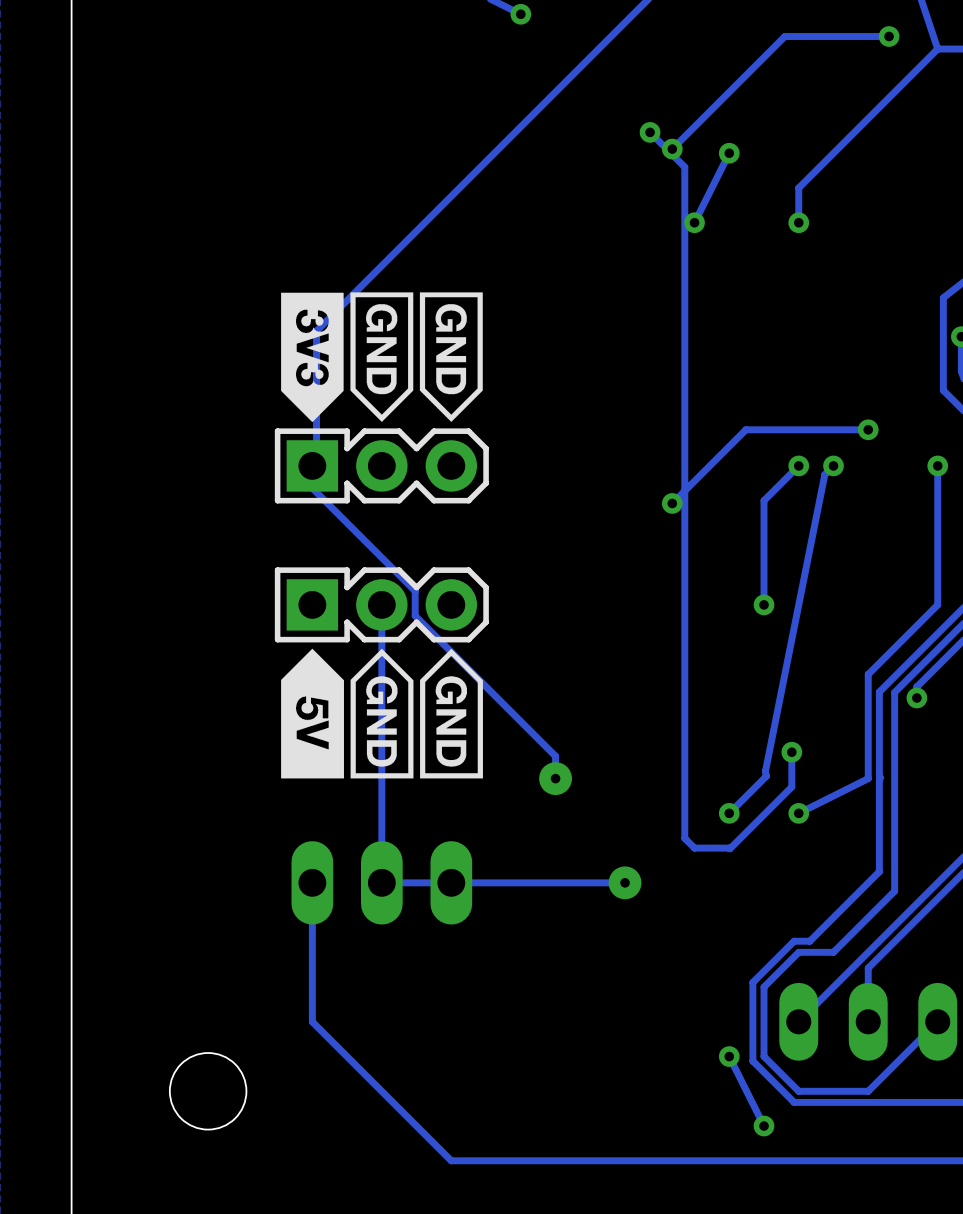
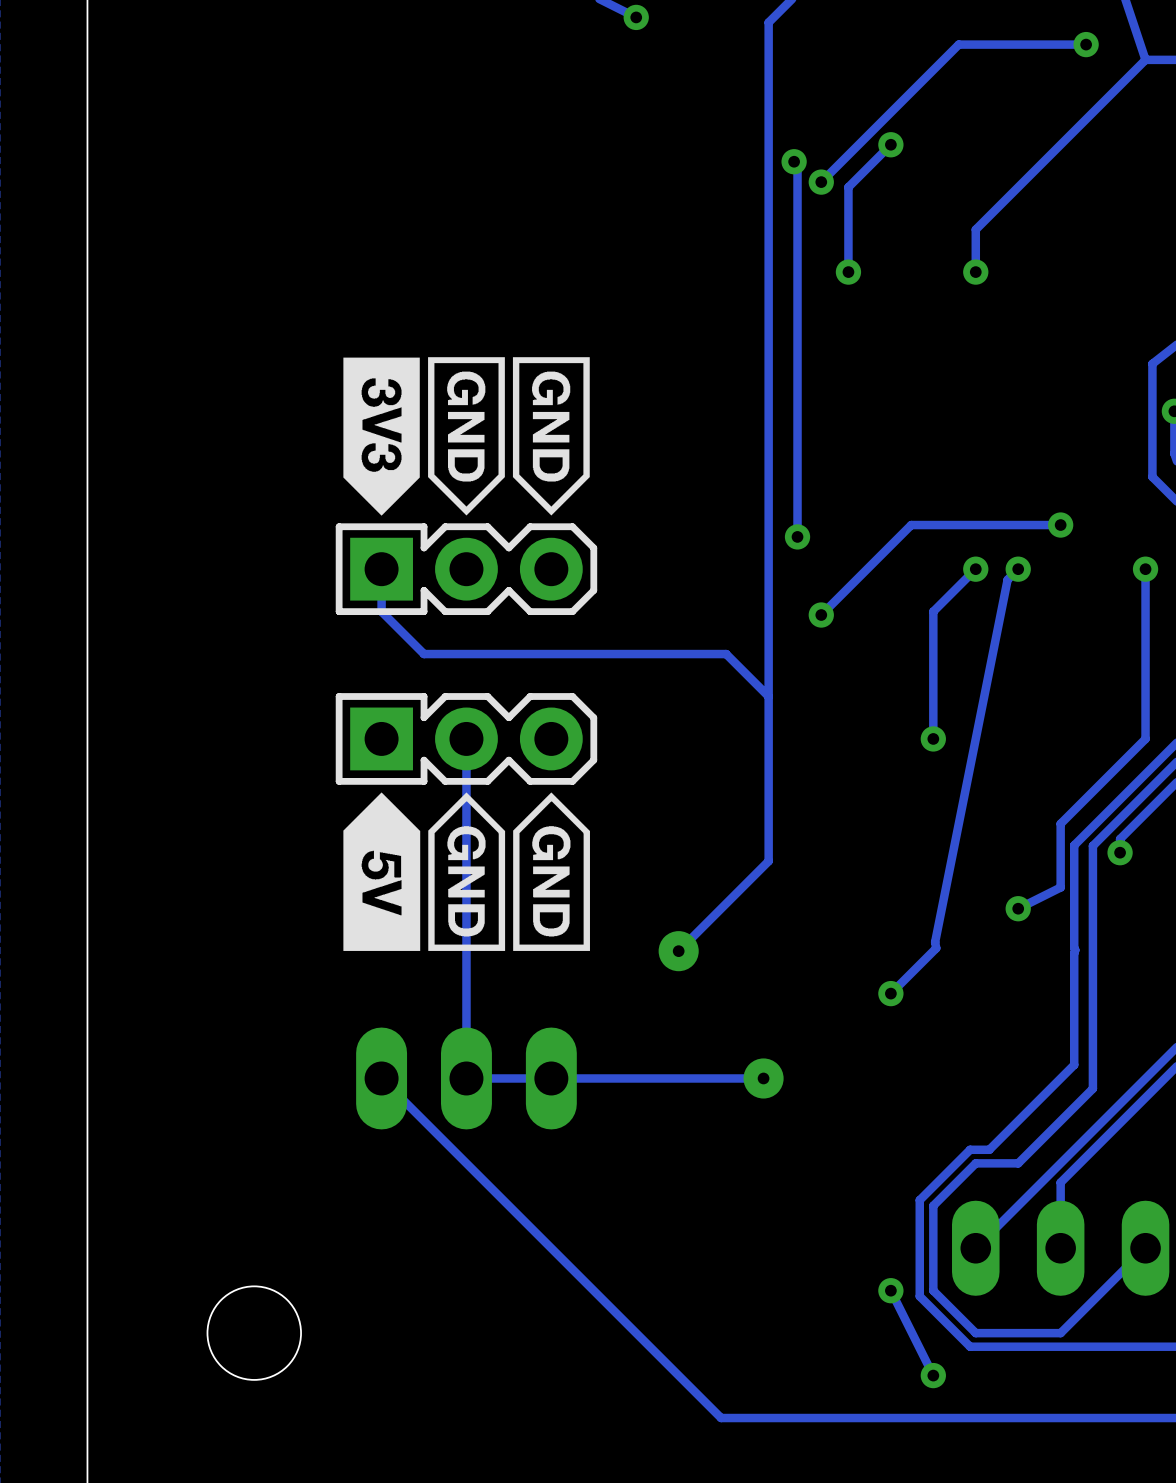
track: (629, 18) (316, 331) (316, 464) (312, 465) -> (768, 22) (768, 861) (678, 951)
track: (652, 135) (684, 167) (684, 838) (694, 848) (729, 848) (791, 786) (791, 752) -> (797, 165) (797, 536)
track: (729, 153) (694, 222) -> (890, 144) (848, 187) (848, 272)
via position: (729, 153) -> (890, 144)
via: none -> (797, 536)
track: (312, 488) (415, 591) (415, 615) (555, 756) (555, 778) -> (381, 596) (381, 611) (424, 654) (726, 654) (768, 696)
track: (868, 726) (868, 778) (798, 813) -> (1060, 887) (1018, 908)
via: none -> (1018, 908)
via: (791, 752) -> none
via: (798, 813) -> none
track: (312, 882) (312, 1021) (451, 1160) (590, 1160) -> (381, 1078) (721, 1418)

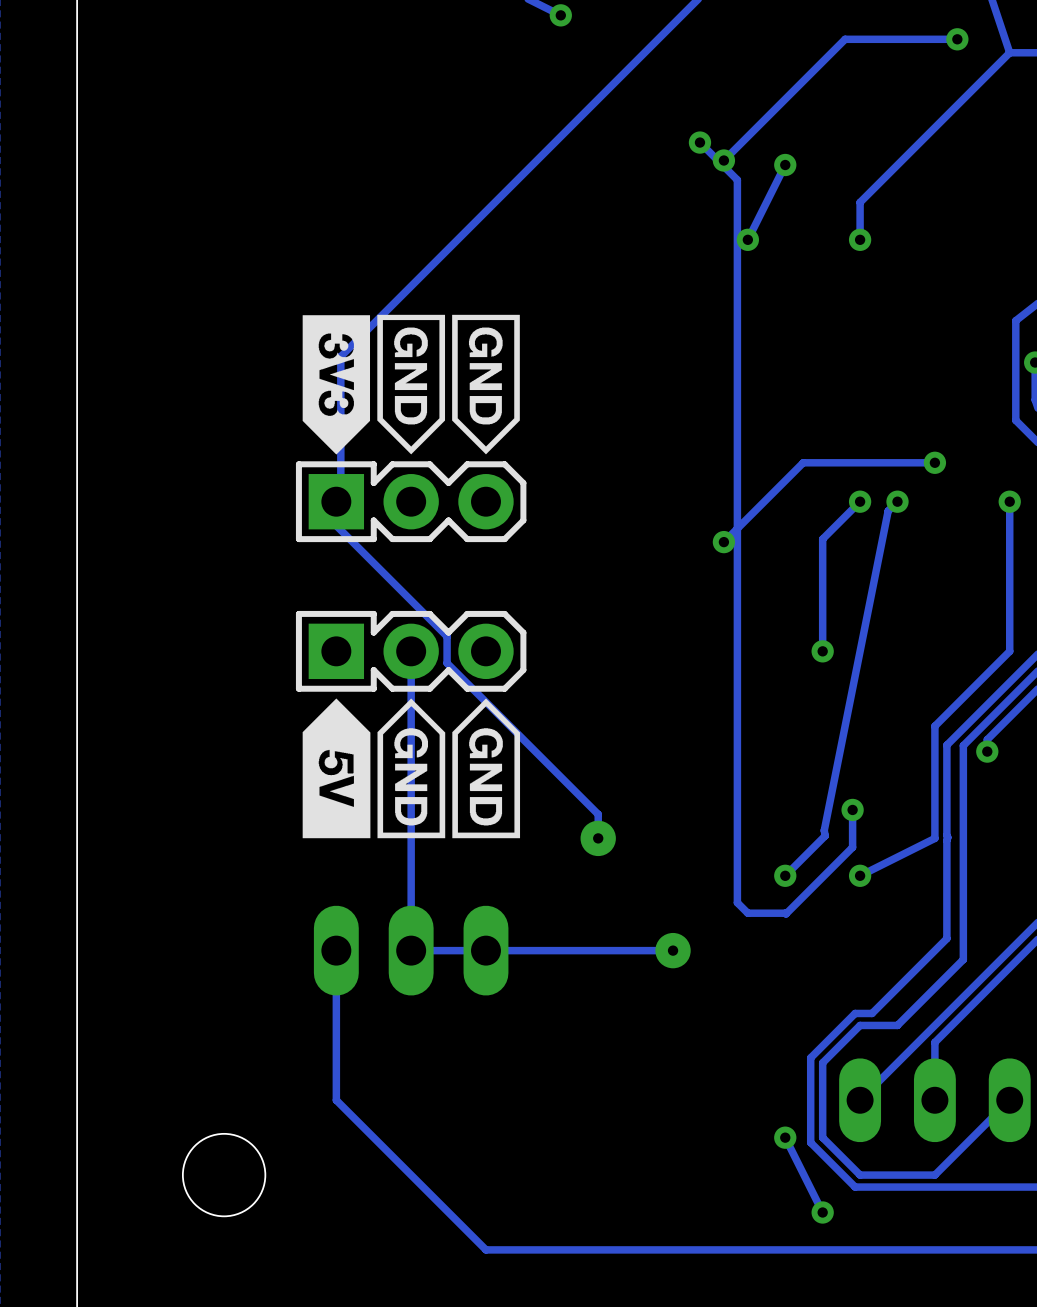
track: (768, 22) (768, 861) (678, 951) -> (677, 19) (340, 356) (340, 500) (336, 501)
track: (890, 144) (848, 187) (848, 272) -> (785, 165) (747, 239)
via position: (890, 144) -> (785, 165)
track: (797, 165) (797, 536) -> (702, 145) (737, 179) (737, 902) (747, 913) (786, 913) (852, 847) (852, 809)
via: (797, 536) -> none
track: (381, 596) (381, 611) (424, 654) (726, 654) (768, 696) -> (336, 525) (447, 636) (447, 663) (598, 814) (598, 838)
track: (1060, 887) (1018, 908) -> (934, 782) (934, 838) (860, 875)
via: (1018, 908) -> none
via: none -> (852, 809)
via: none -> (860, 875)
track: (381, 1078) (721, 1418) -> (336, 950) (336, 1100) (485, 1249) (635, 1249)

